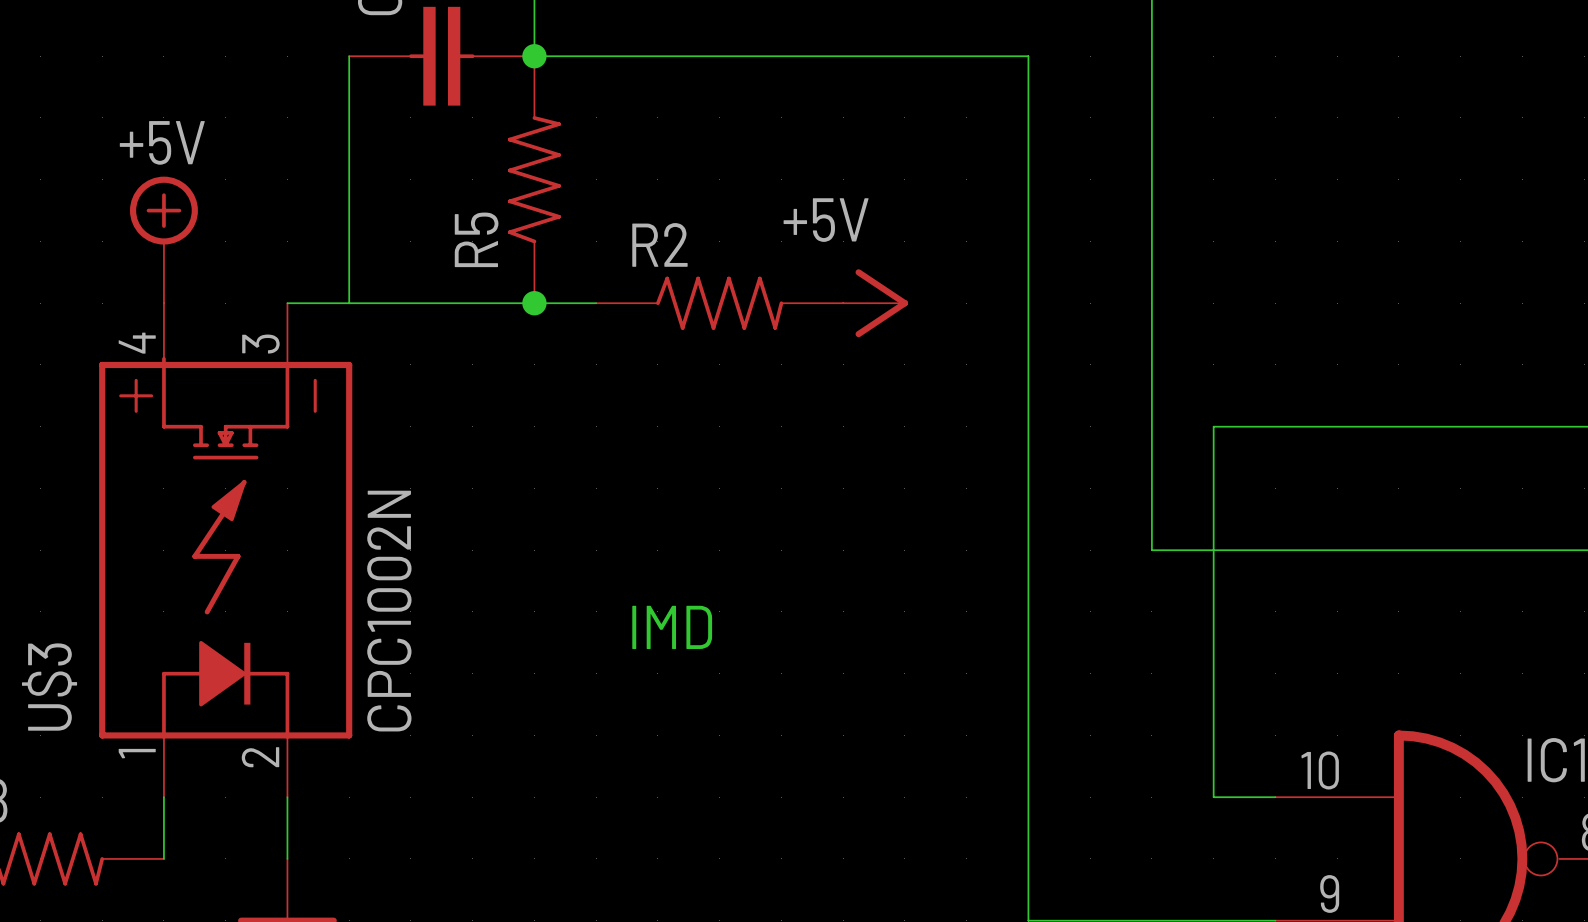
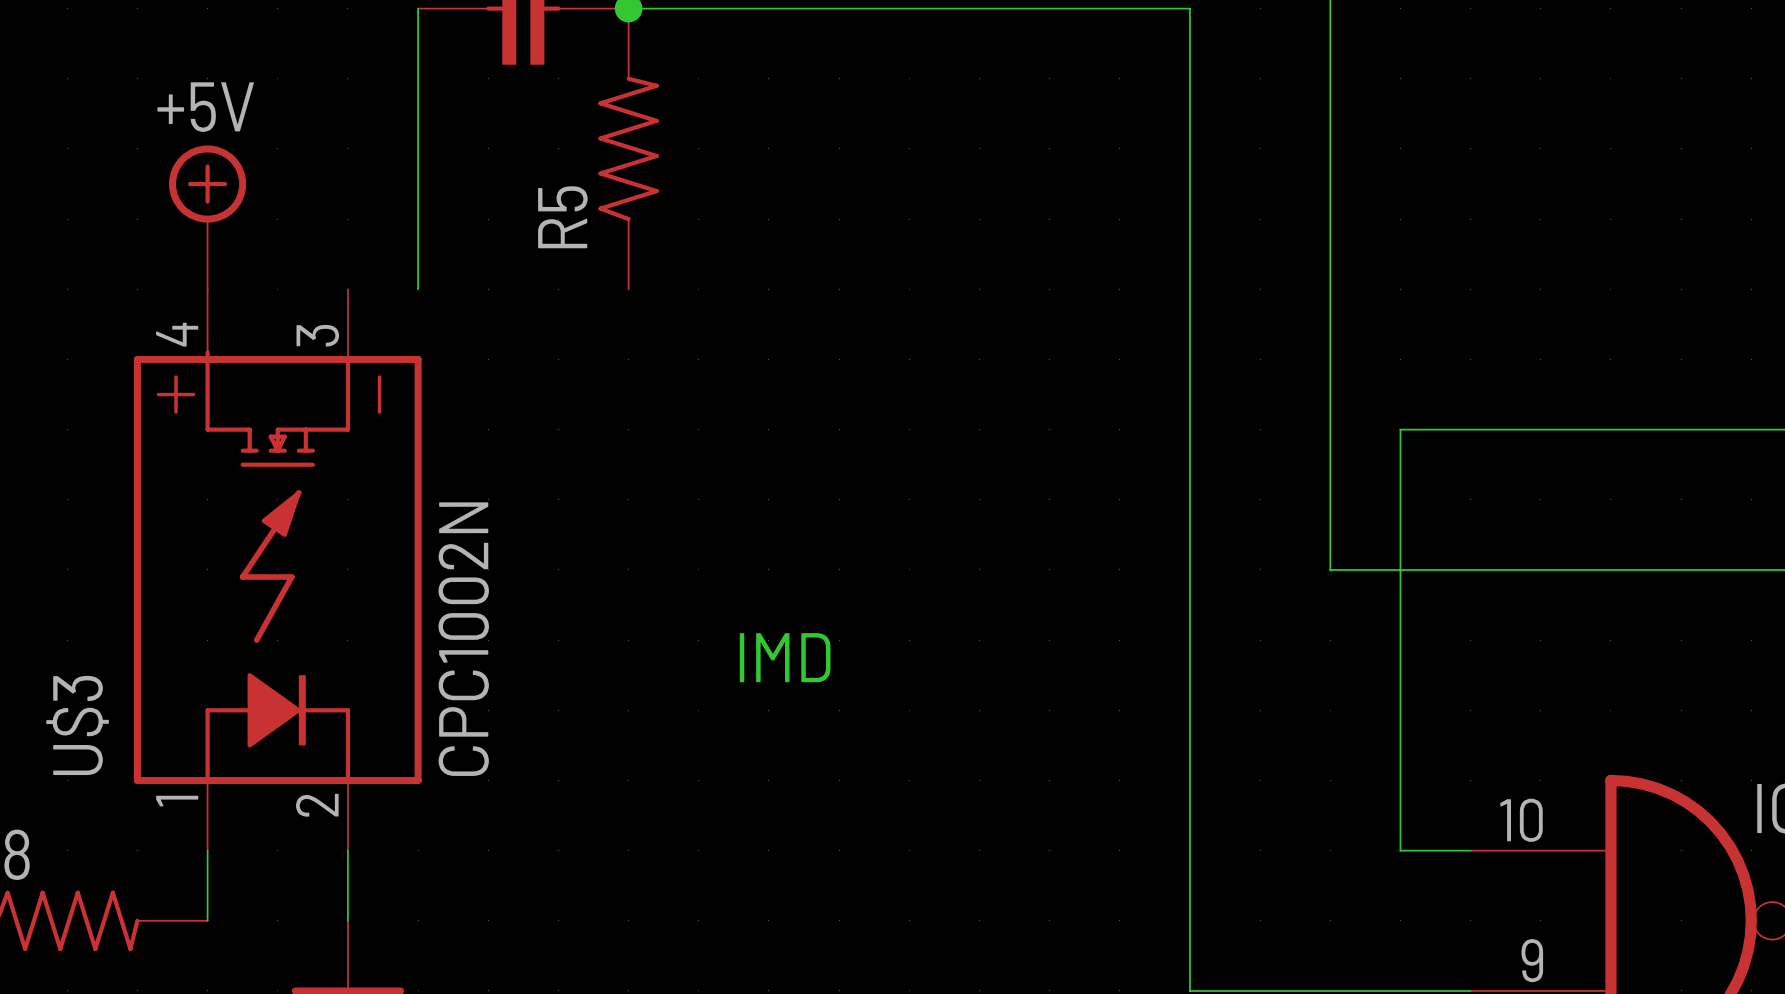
wire: (287, 303) (596, 303) -> none
junction: (534, 303) -> none
R2: (719, 303) -> none
power symbol: +5V (875, 303) -> none

